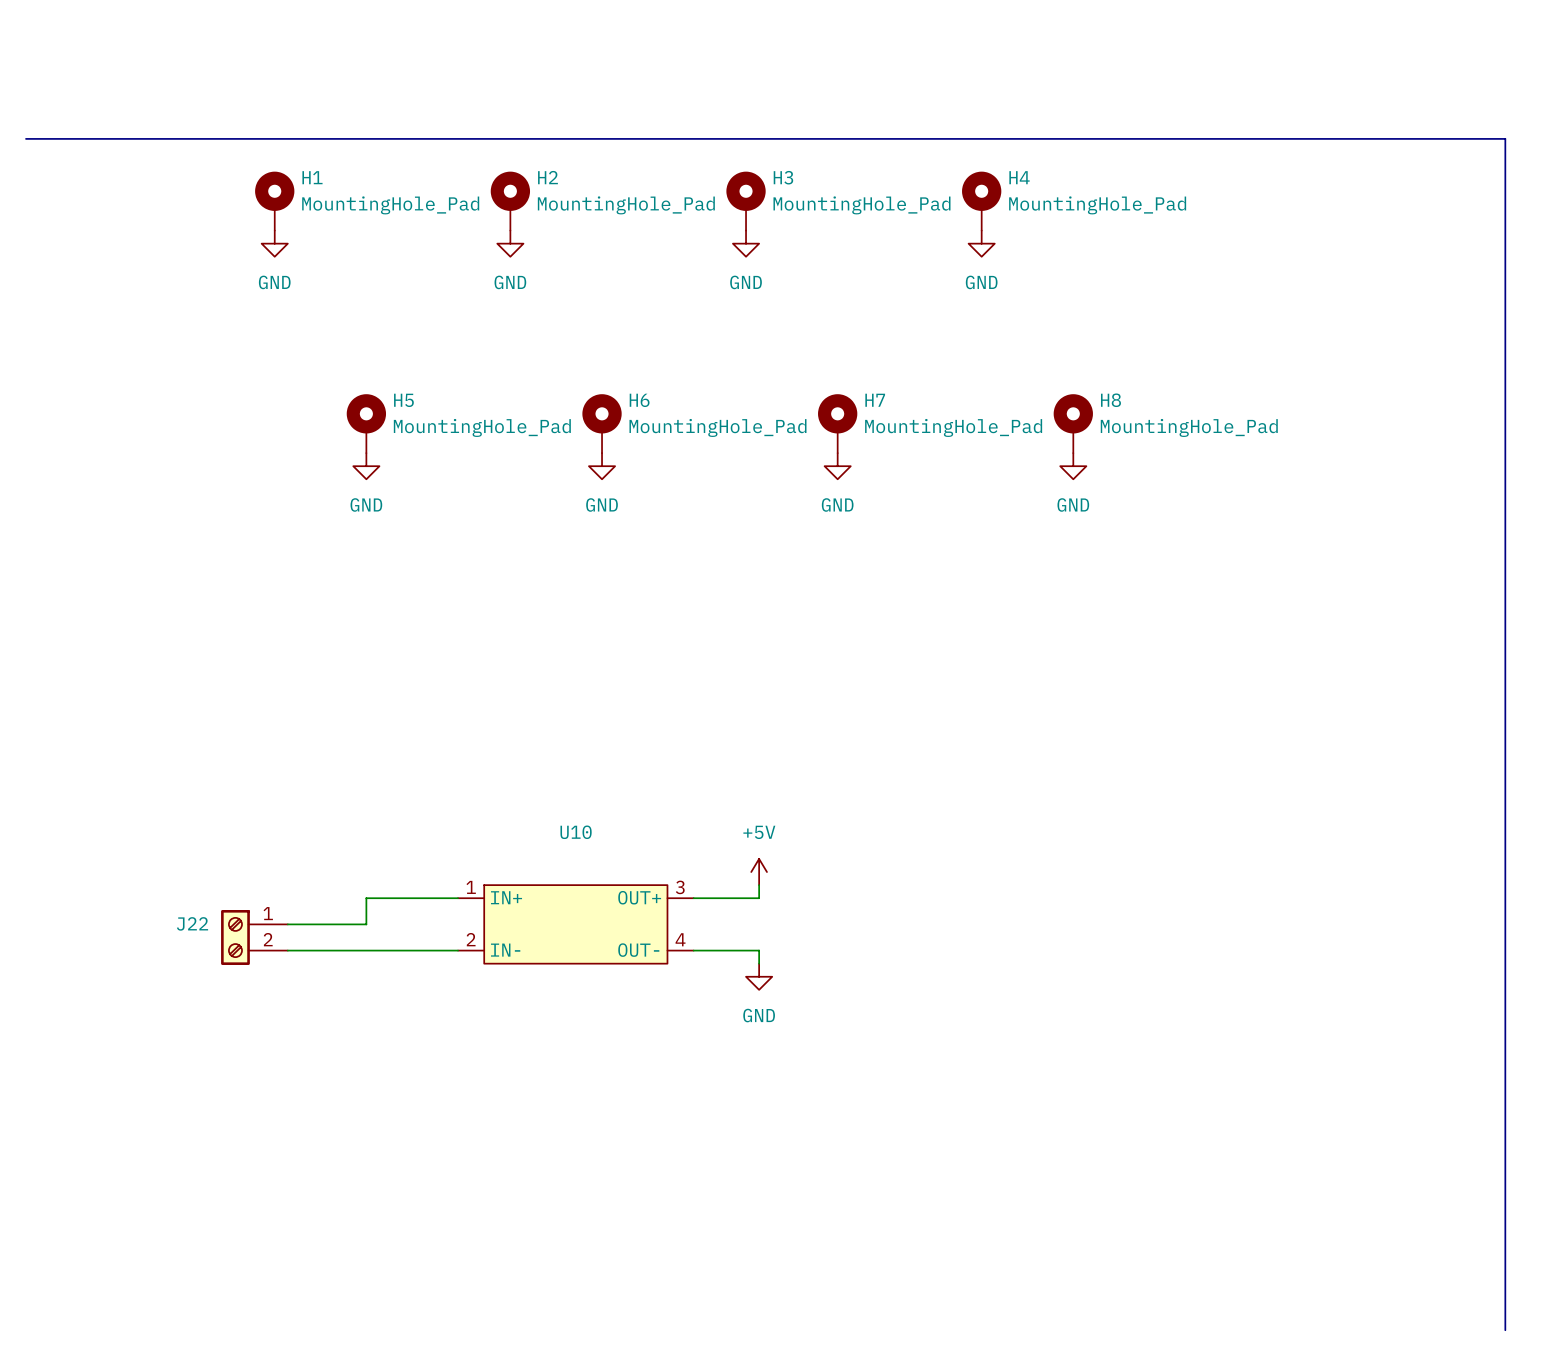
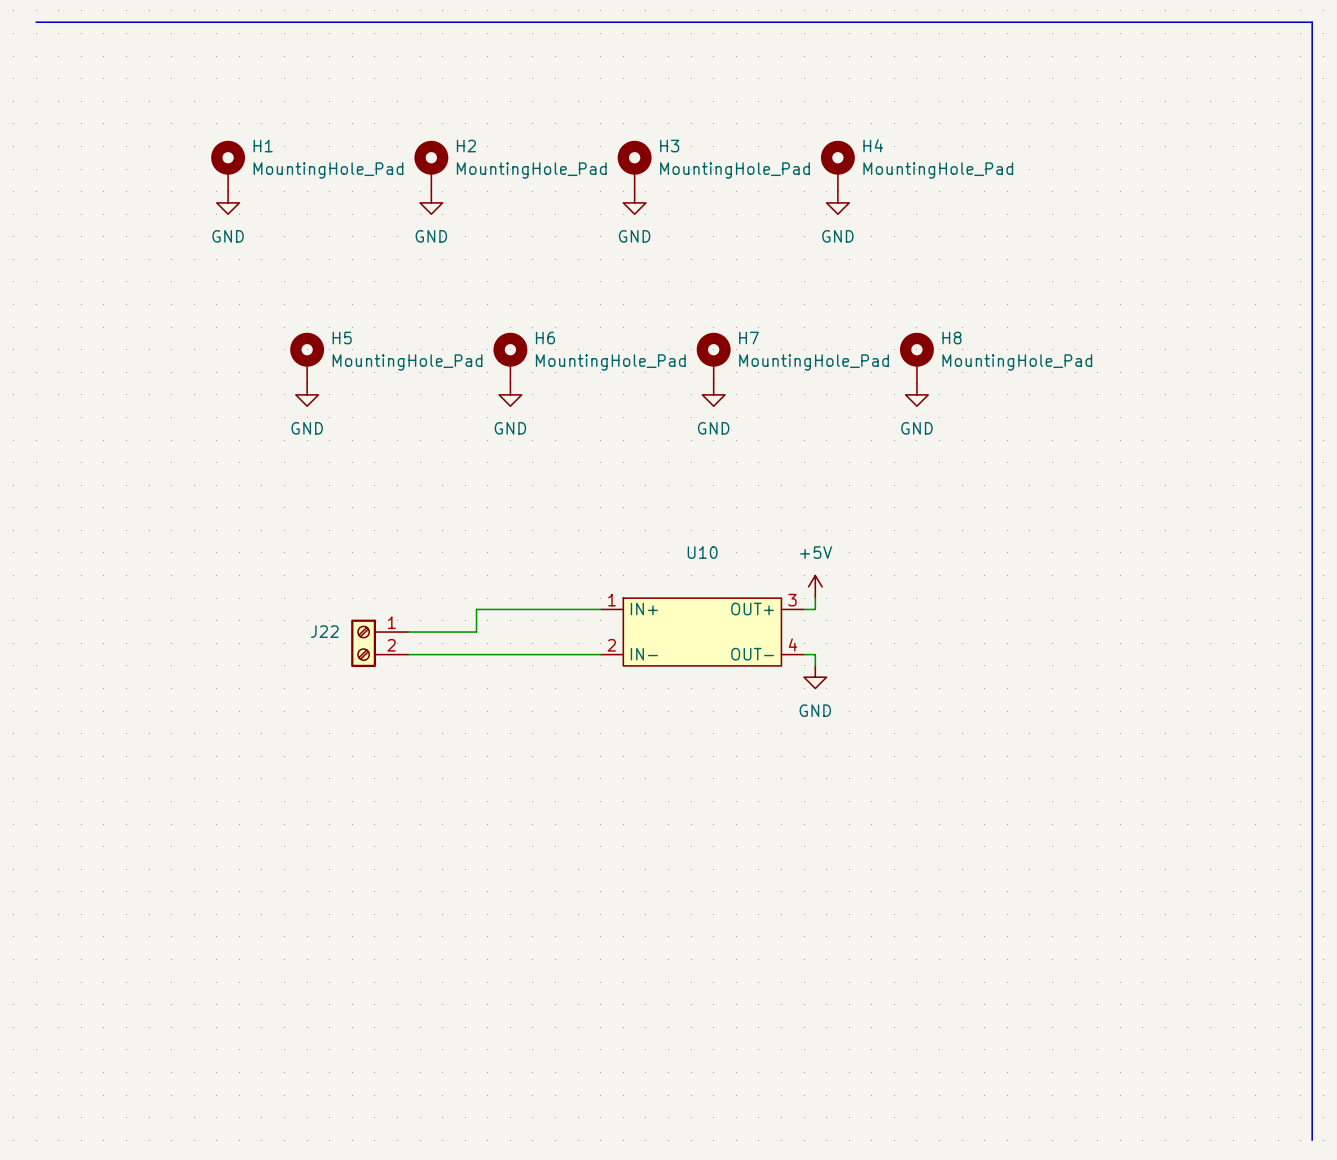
line: none -> (36, 22) (1312, 22) (1312, 1140)
line: (26, 138) (1505, 138) (1505, 1330) -> none
power symbol: none -> +5V (815, 586)
wire: none -> (815, 598) (815, 609) (804, 609)
wire: none -> (600, 609) (476, 609) (476, 632) (408, 632)
wire: none -> (408, 654) (600, 654)
wire: none -> (804, 654) (815, 654) (815, 665)
power symbol: none -> GND (815, 677)
power symbol: +5V (759, 872) -> none
wire: (759, 885) (759, 898) (693, 898) -> none
wire: (458, 898) (366, 898) (366, 924) (287, 924) -> none
U10 position: (575, 924) -> (702, 632)
J22 position: (254, 937) -> (379, 643)
wire: (287, 950) (458, 950) -> none
wire: (693, 950) (759, 950) (759, 963) -> none
power symbol: GND (759, 976) -> none

